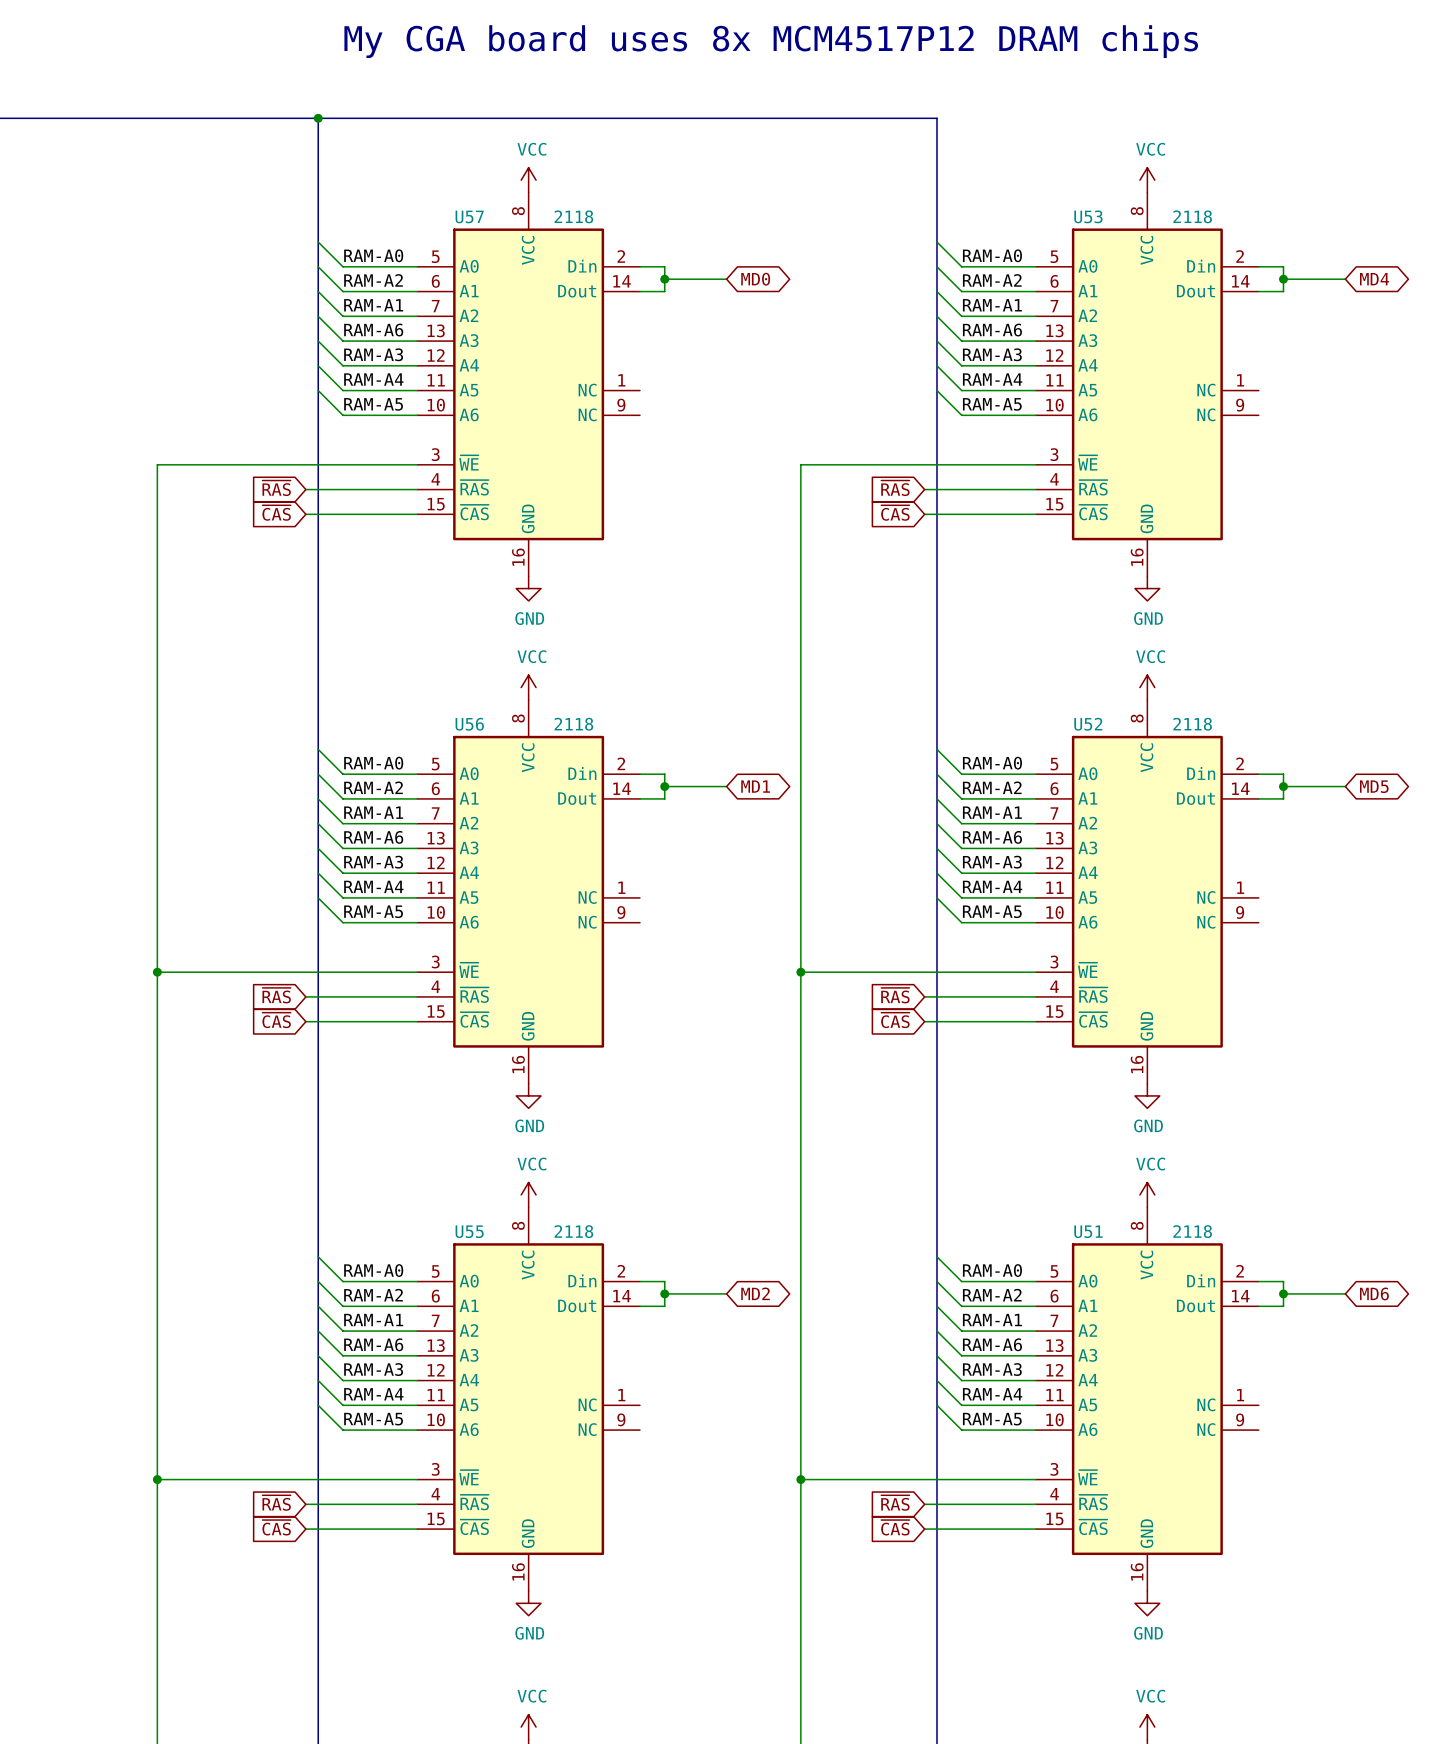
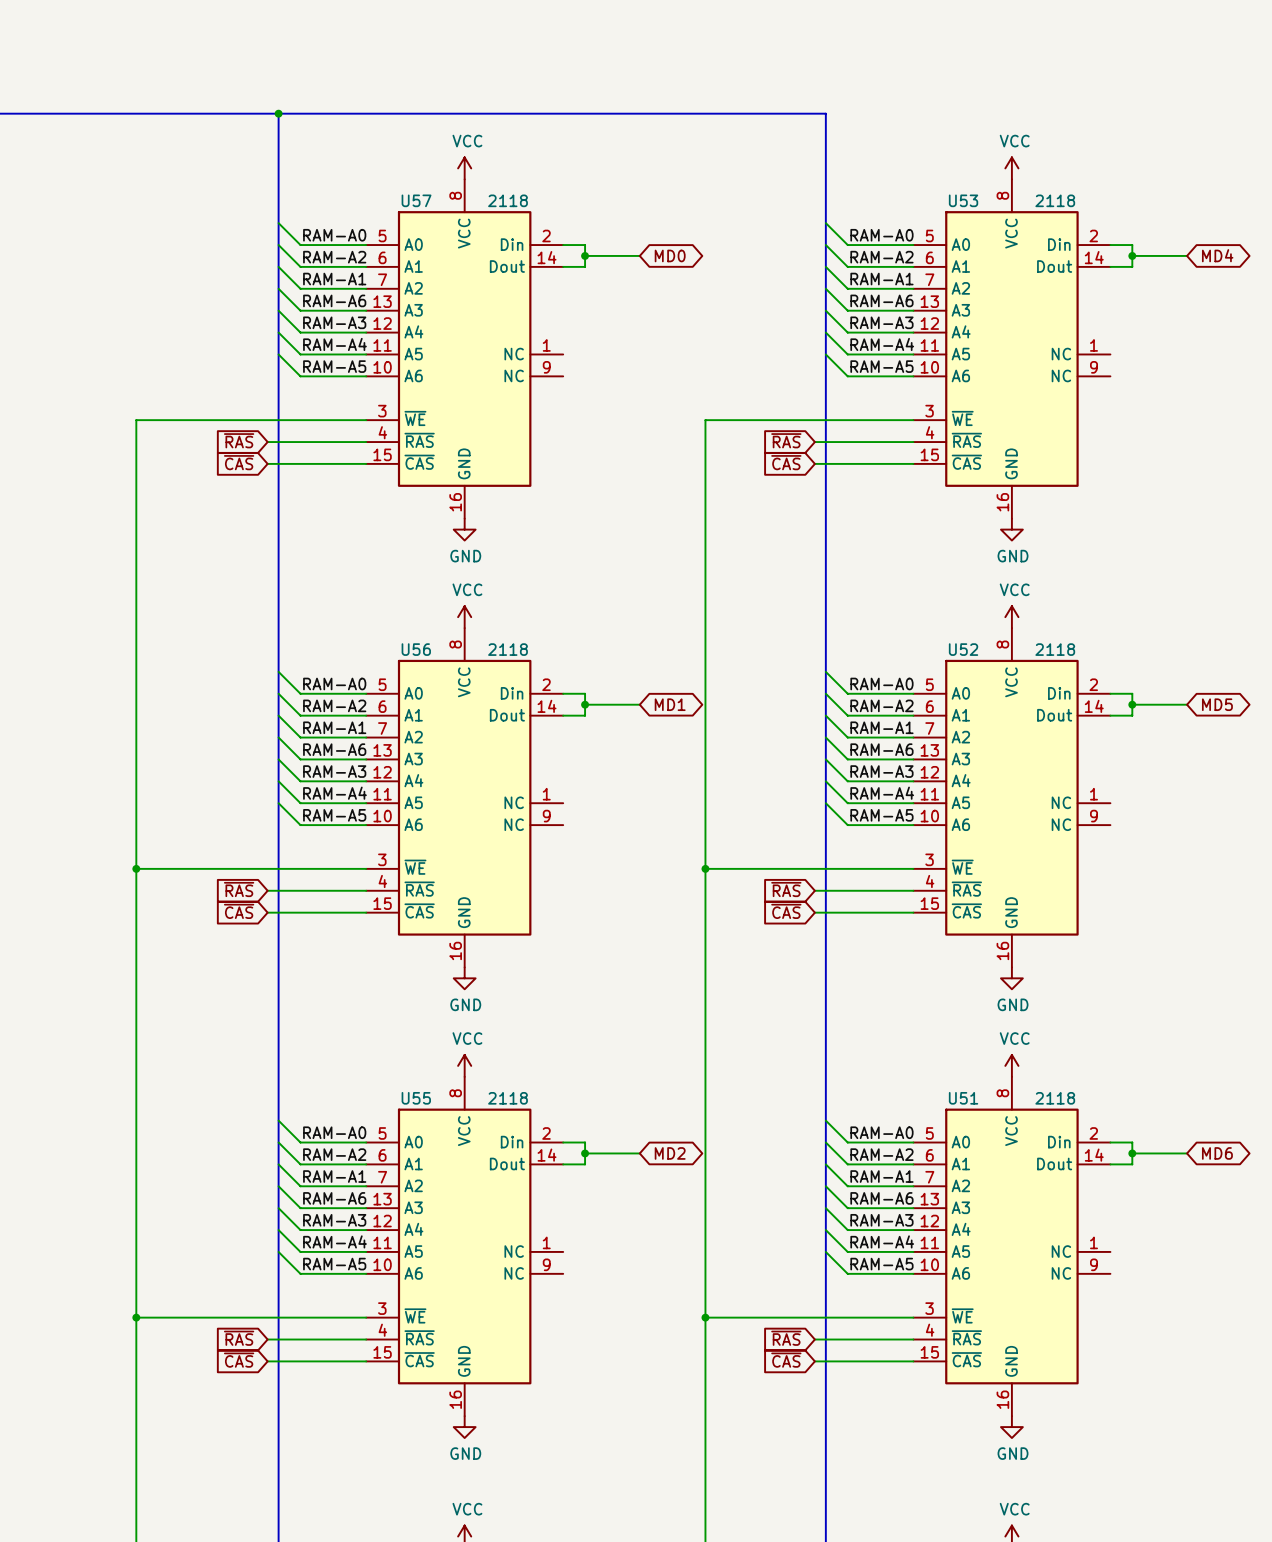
text: My CGA board uses 8x MCM4517P12 DRAM chips (771, 41) -> none

